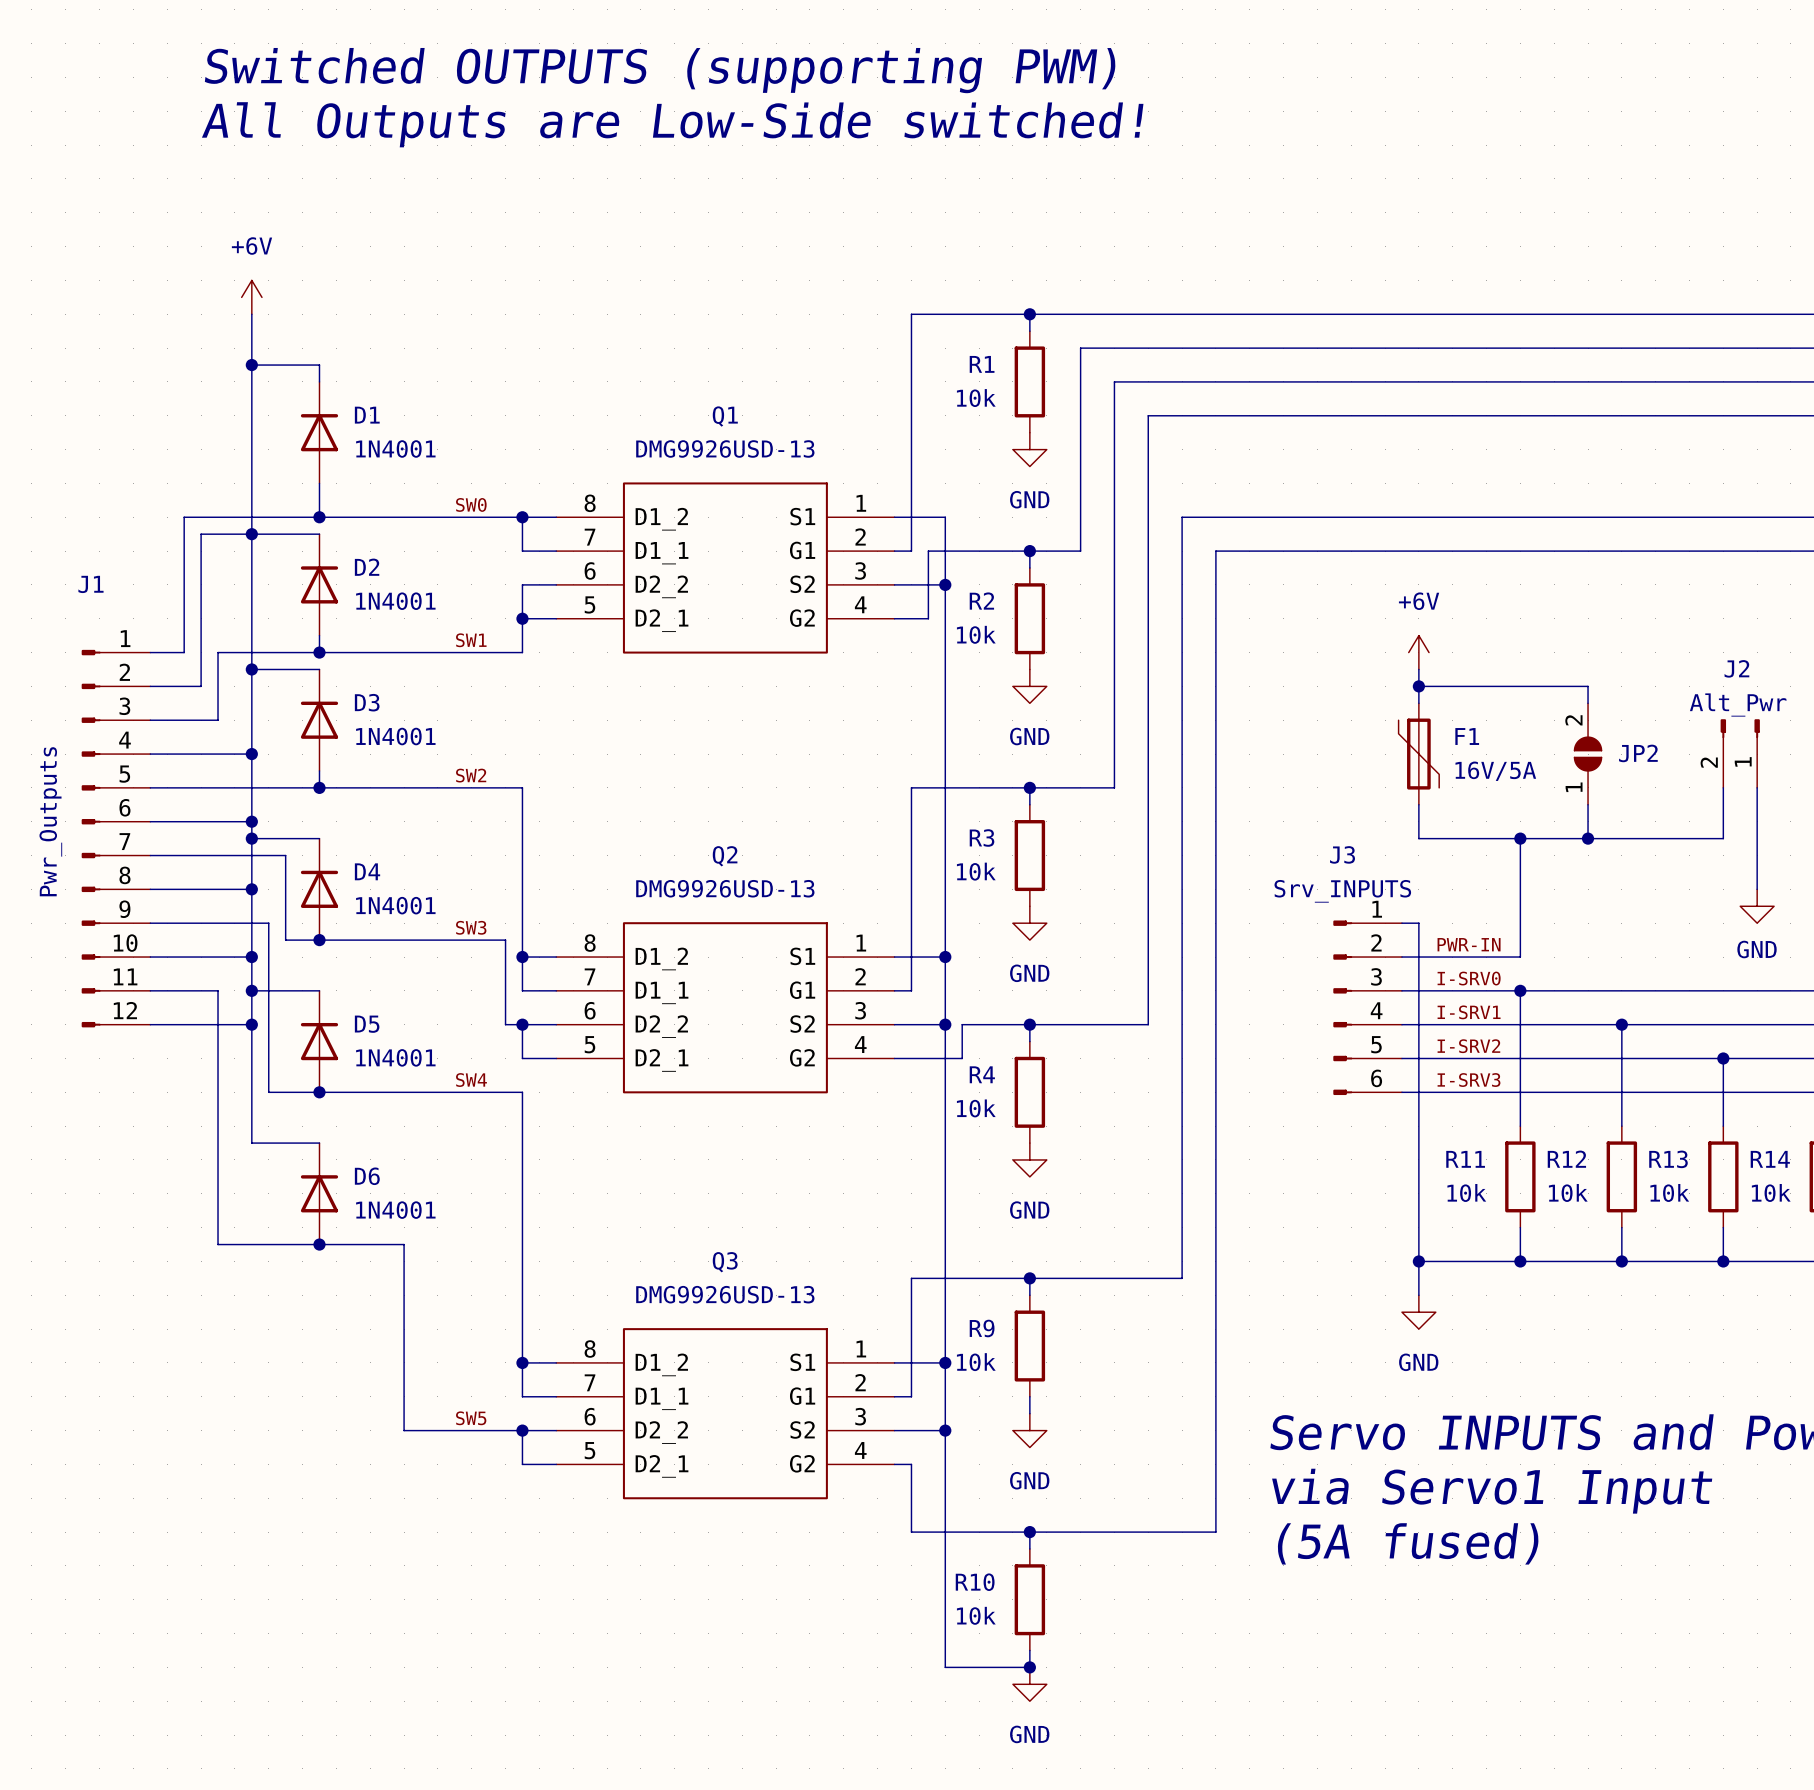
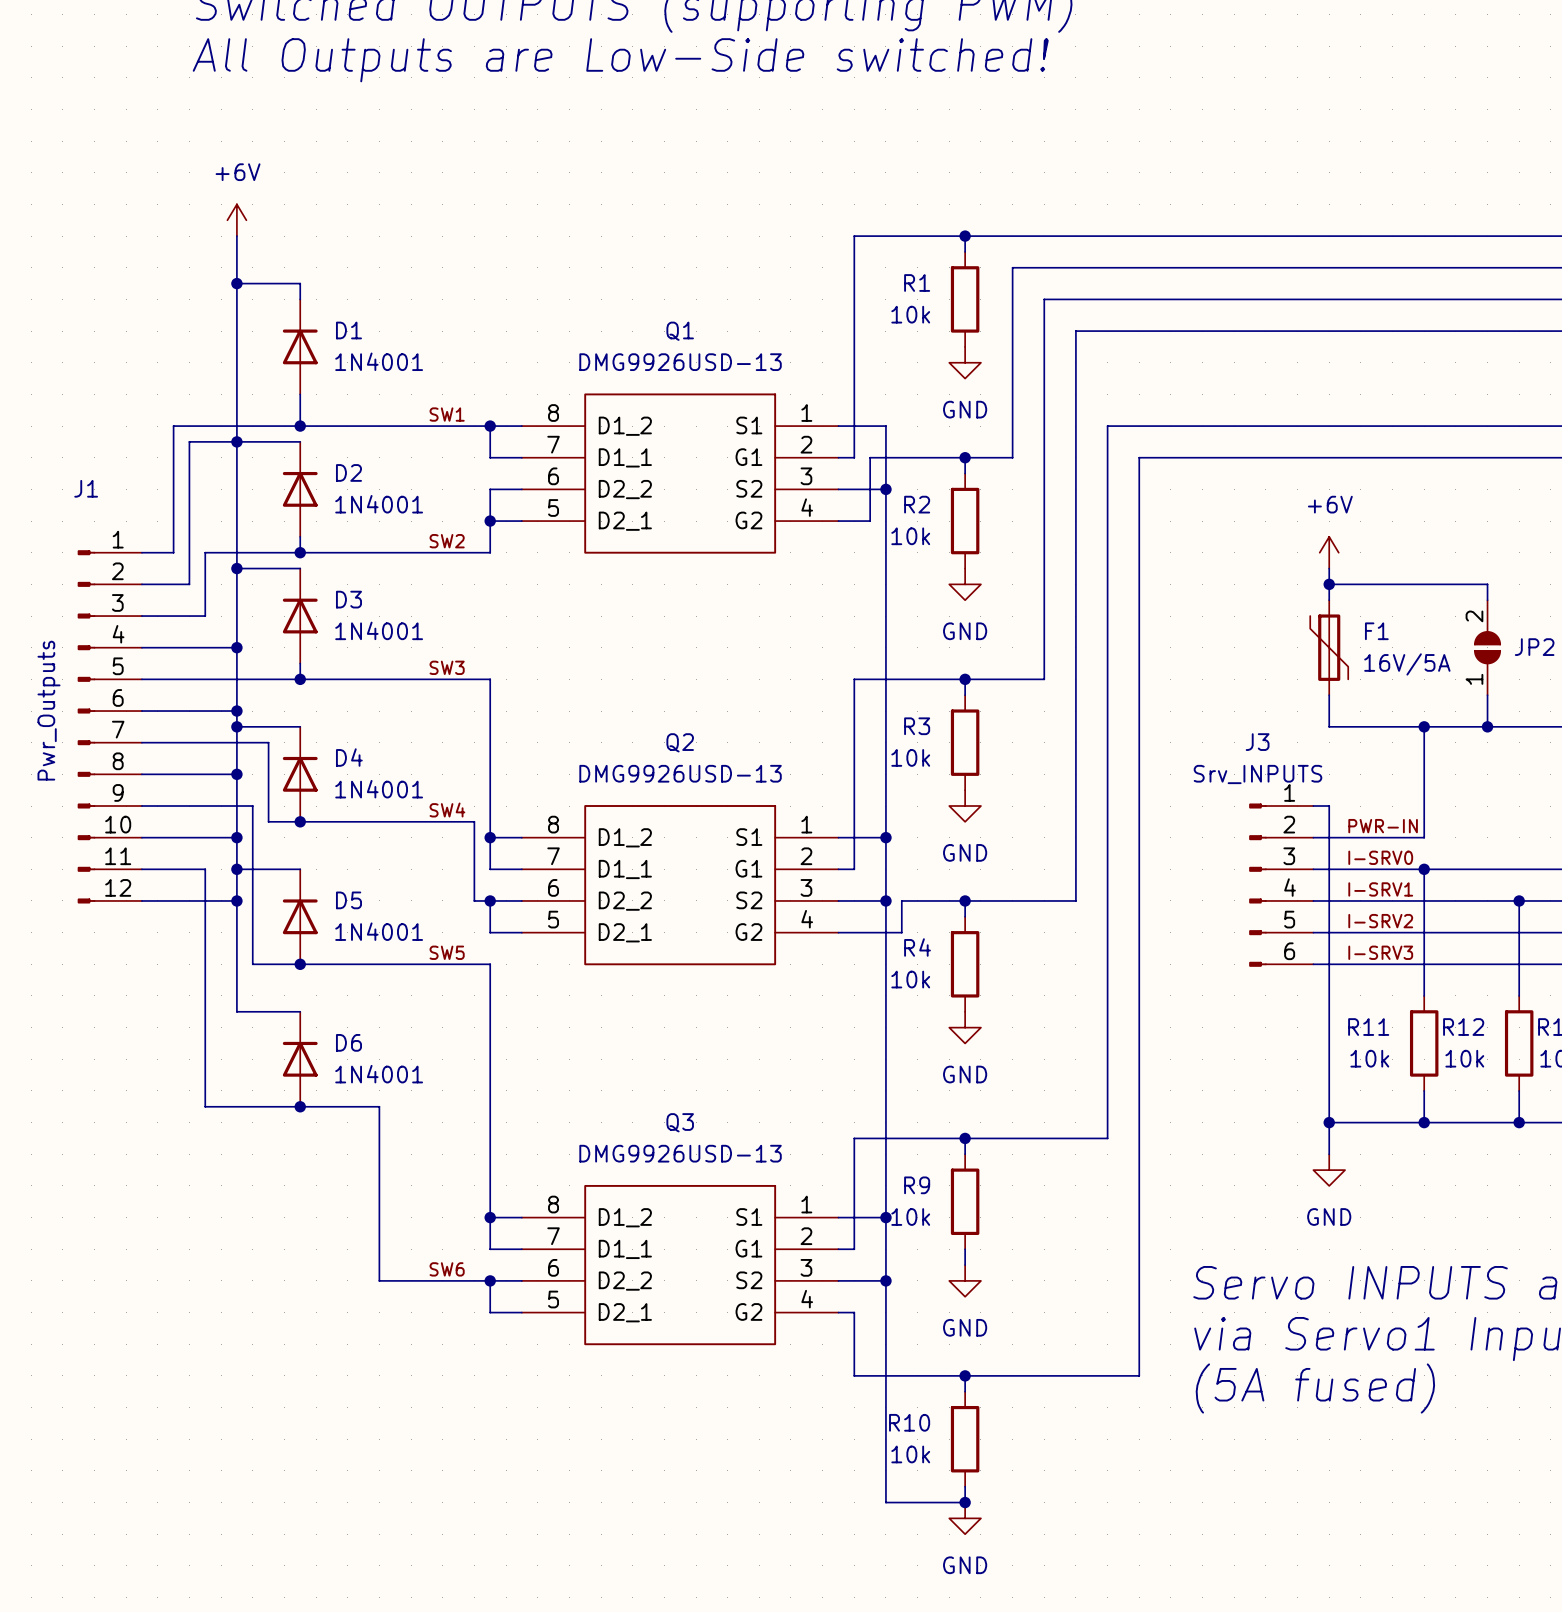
label: SW0 (471, 504) -> SW1 (447, 414)
label: SW1 (471, 640) -> SW2 (447, 541)
label: SW2 (471, 775) -> SW3 (447, 667)
label: SW3 (471, 927) -> SW4 (447, 810)
label: SW4 (471, 1080) -> SW5 (447, 952)
label: SW5 (471, 1418) -> SW6 (447, 1269)

